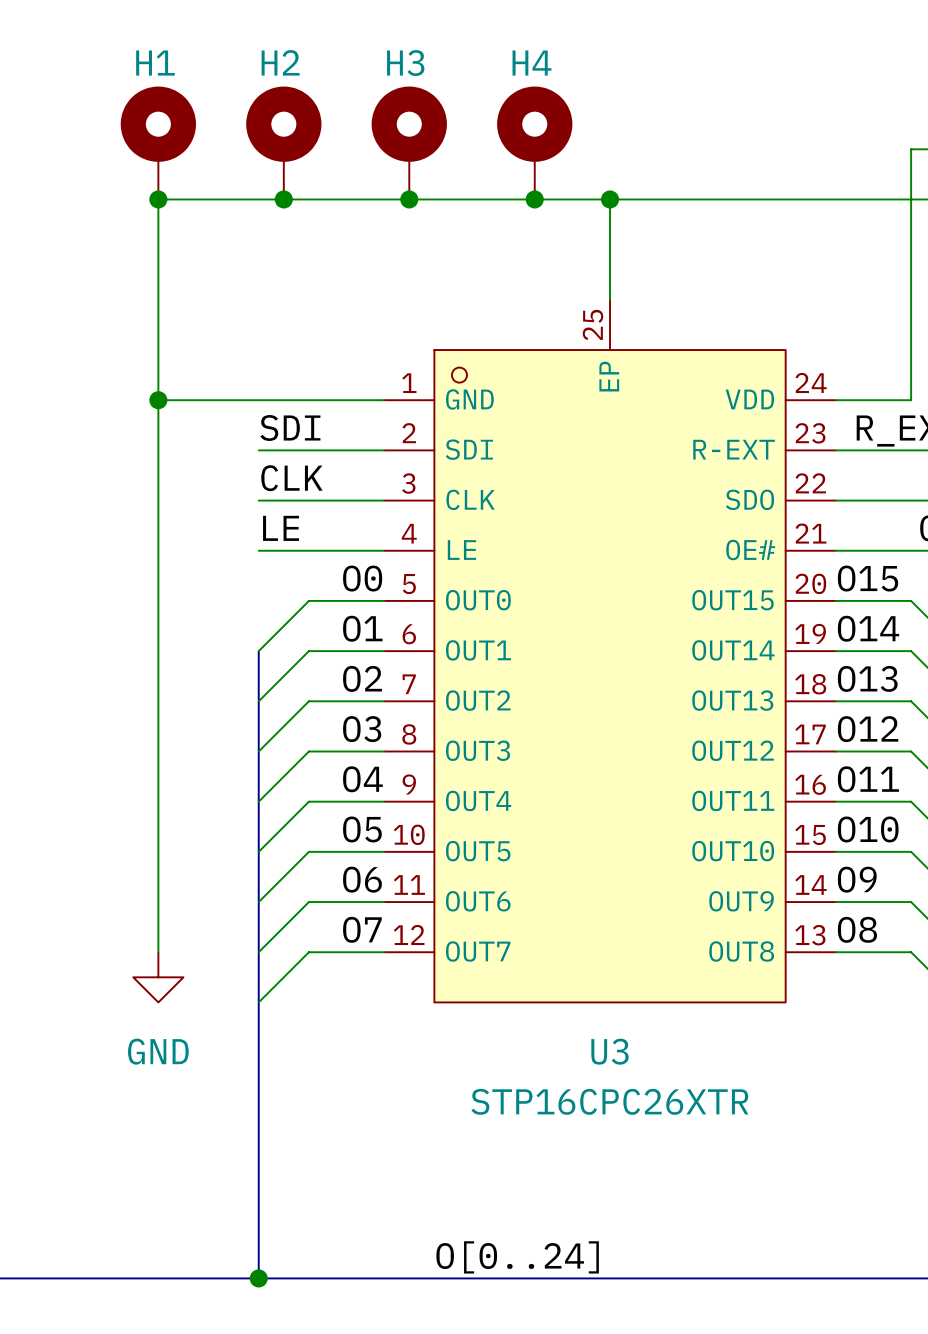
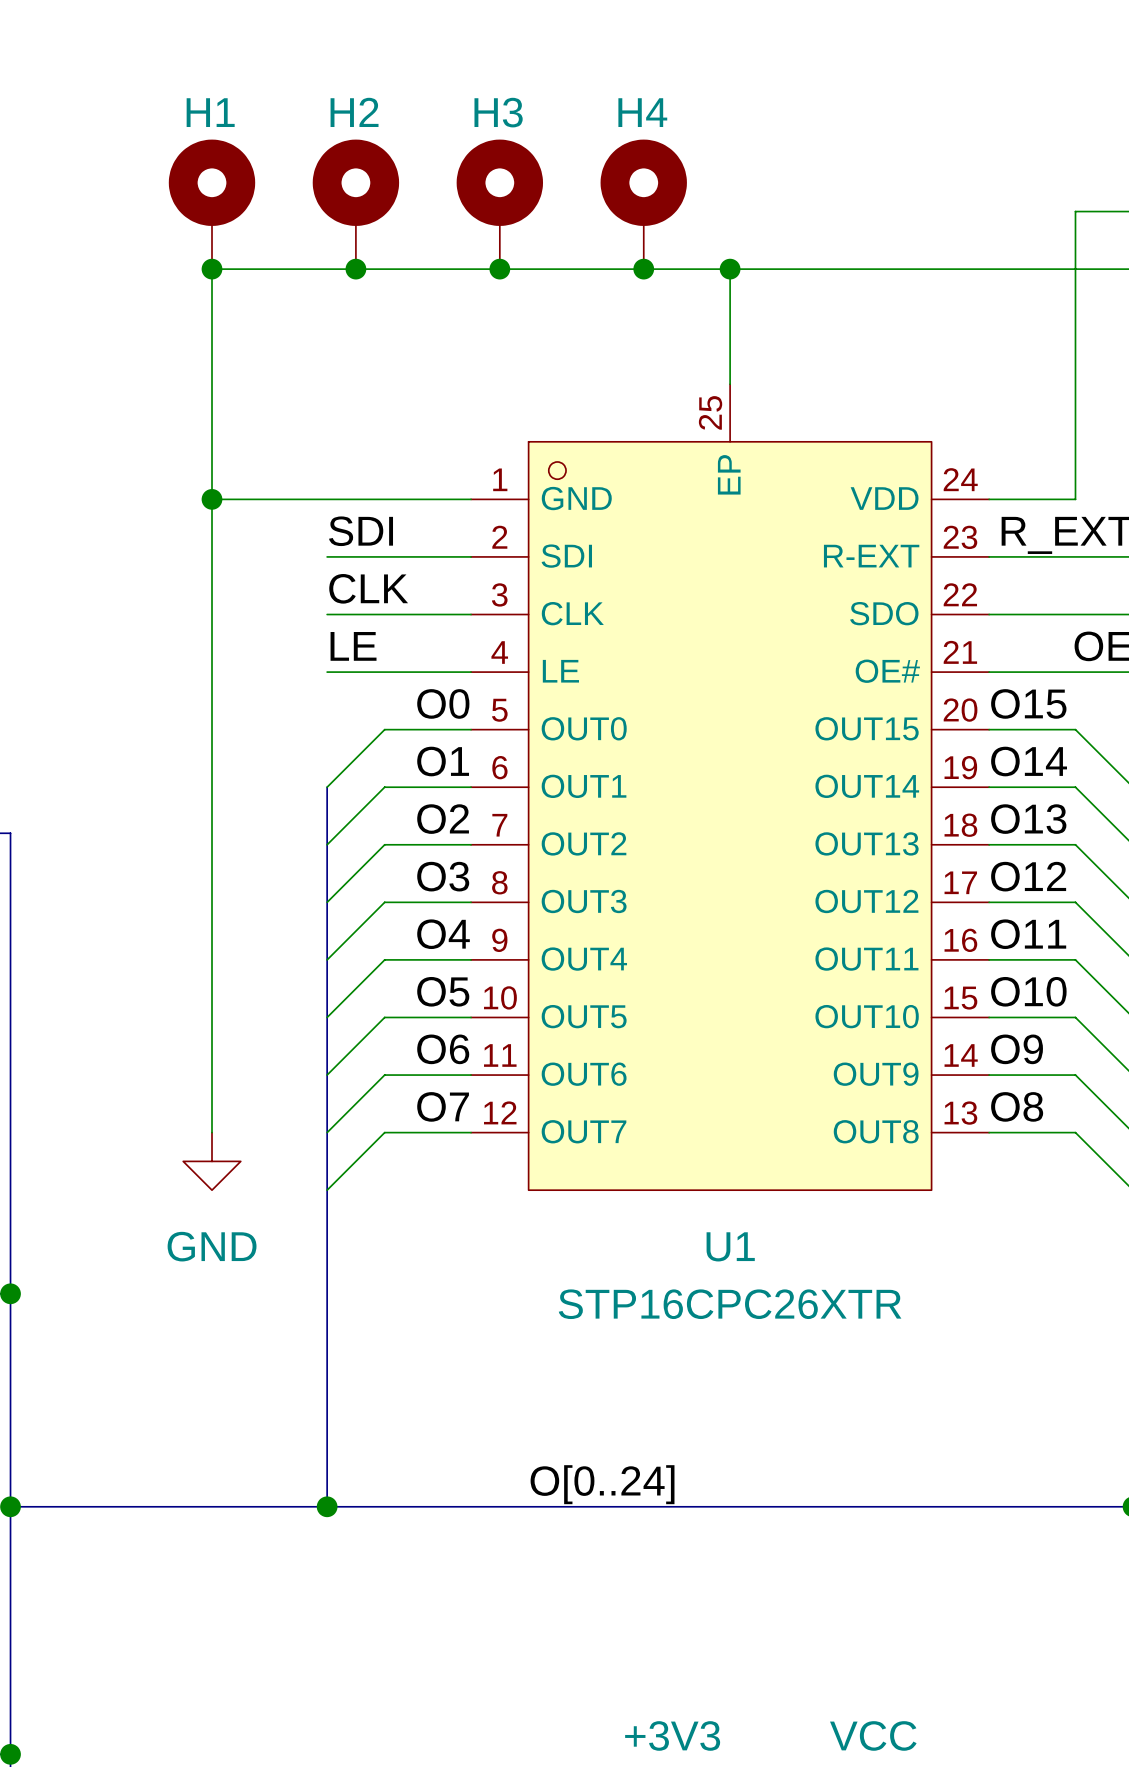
U3 name: U3 (609, 1051) -> U1 (730, 1246)

